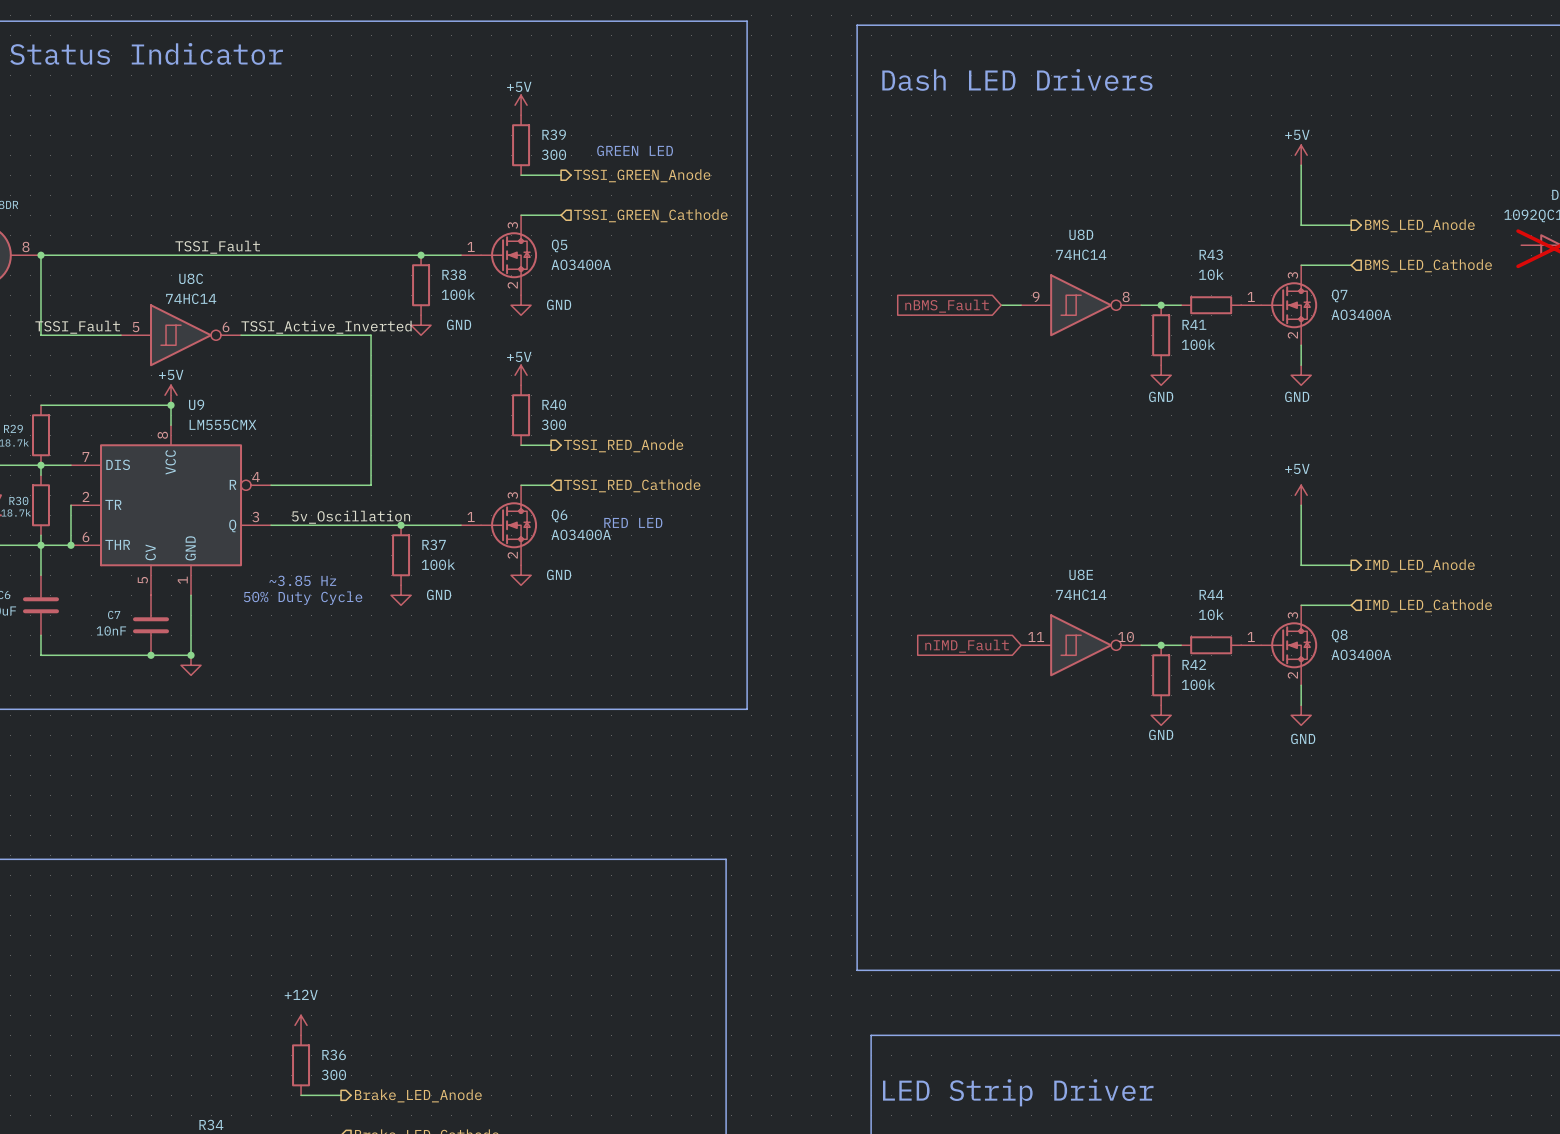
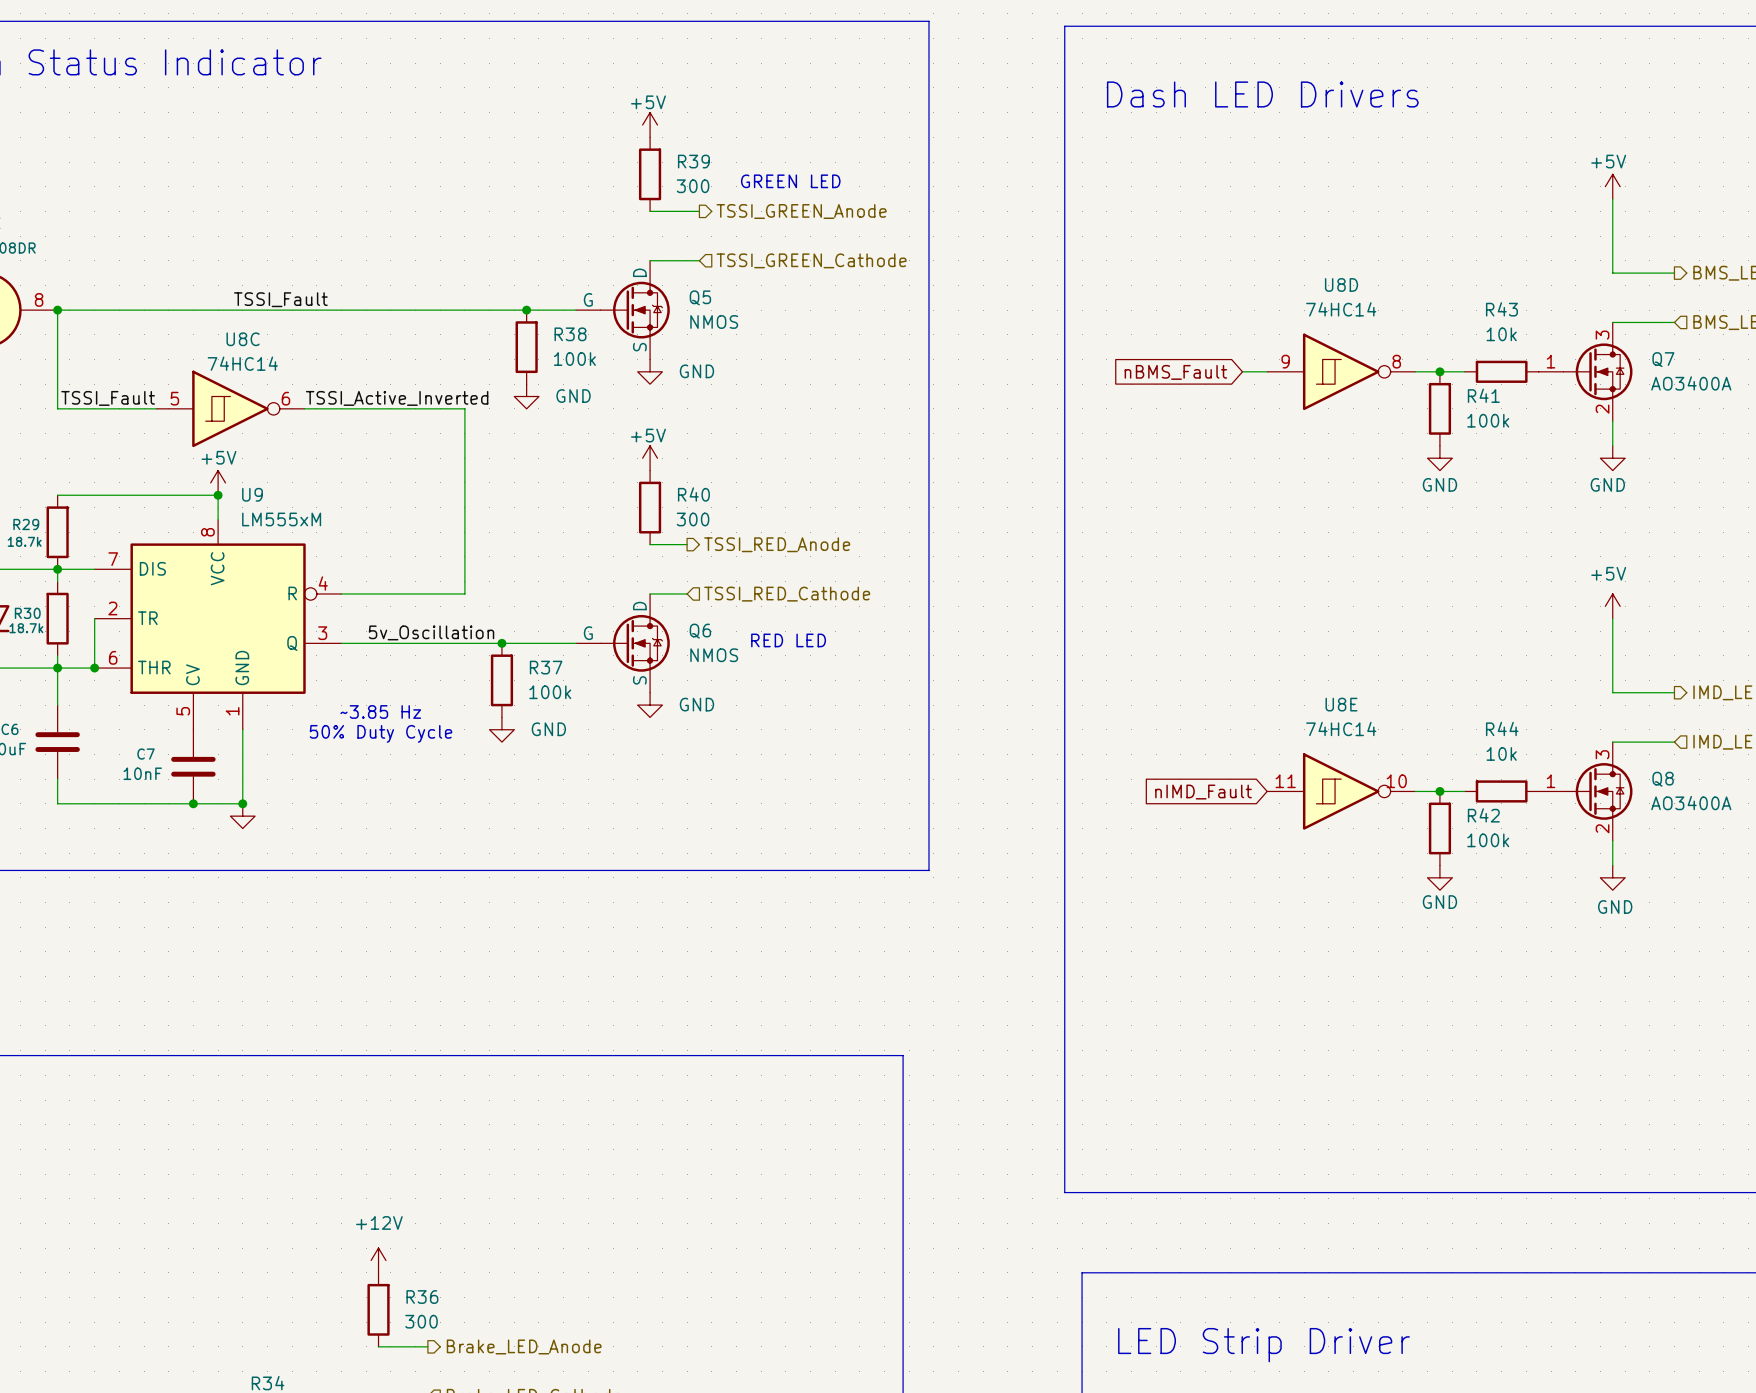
Q5 symbol: [461, 215, 538, 296] -> [576, 260, 670, 360]
Q5 value: AO3400A (581, 264) -> NMOS (714, 321)
U9 value: LM555CMX (222, 424) -> LM555xM (281, 519)
Q6 symbol: [461, 485, 538, 566] -> [576, 593, 670, 693]
Q6 value: AO3400A (581, 534) -> NMOS (714, 655)

